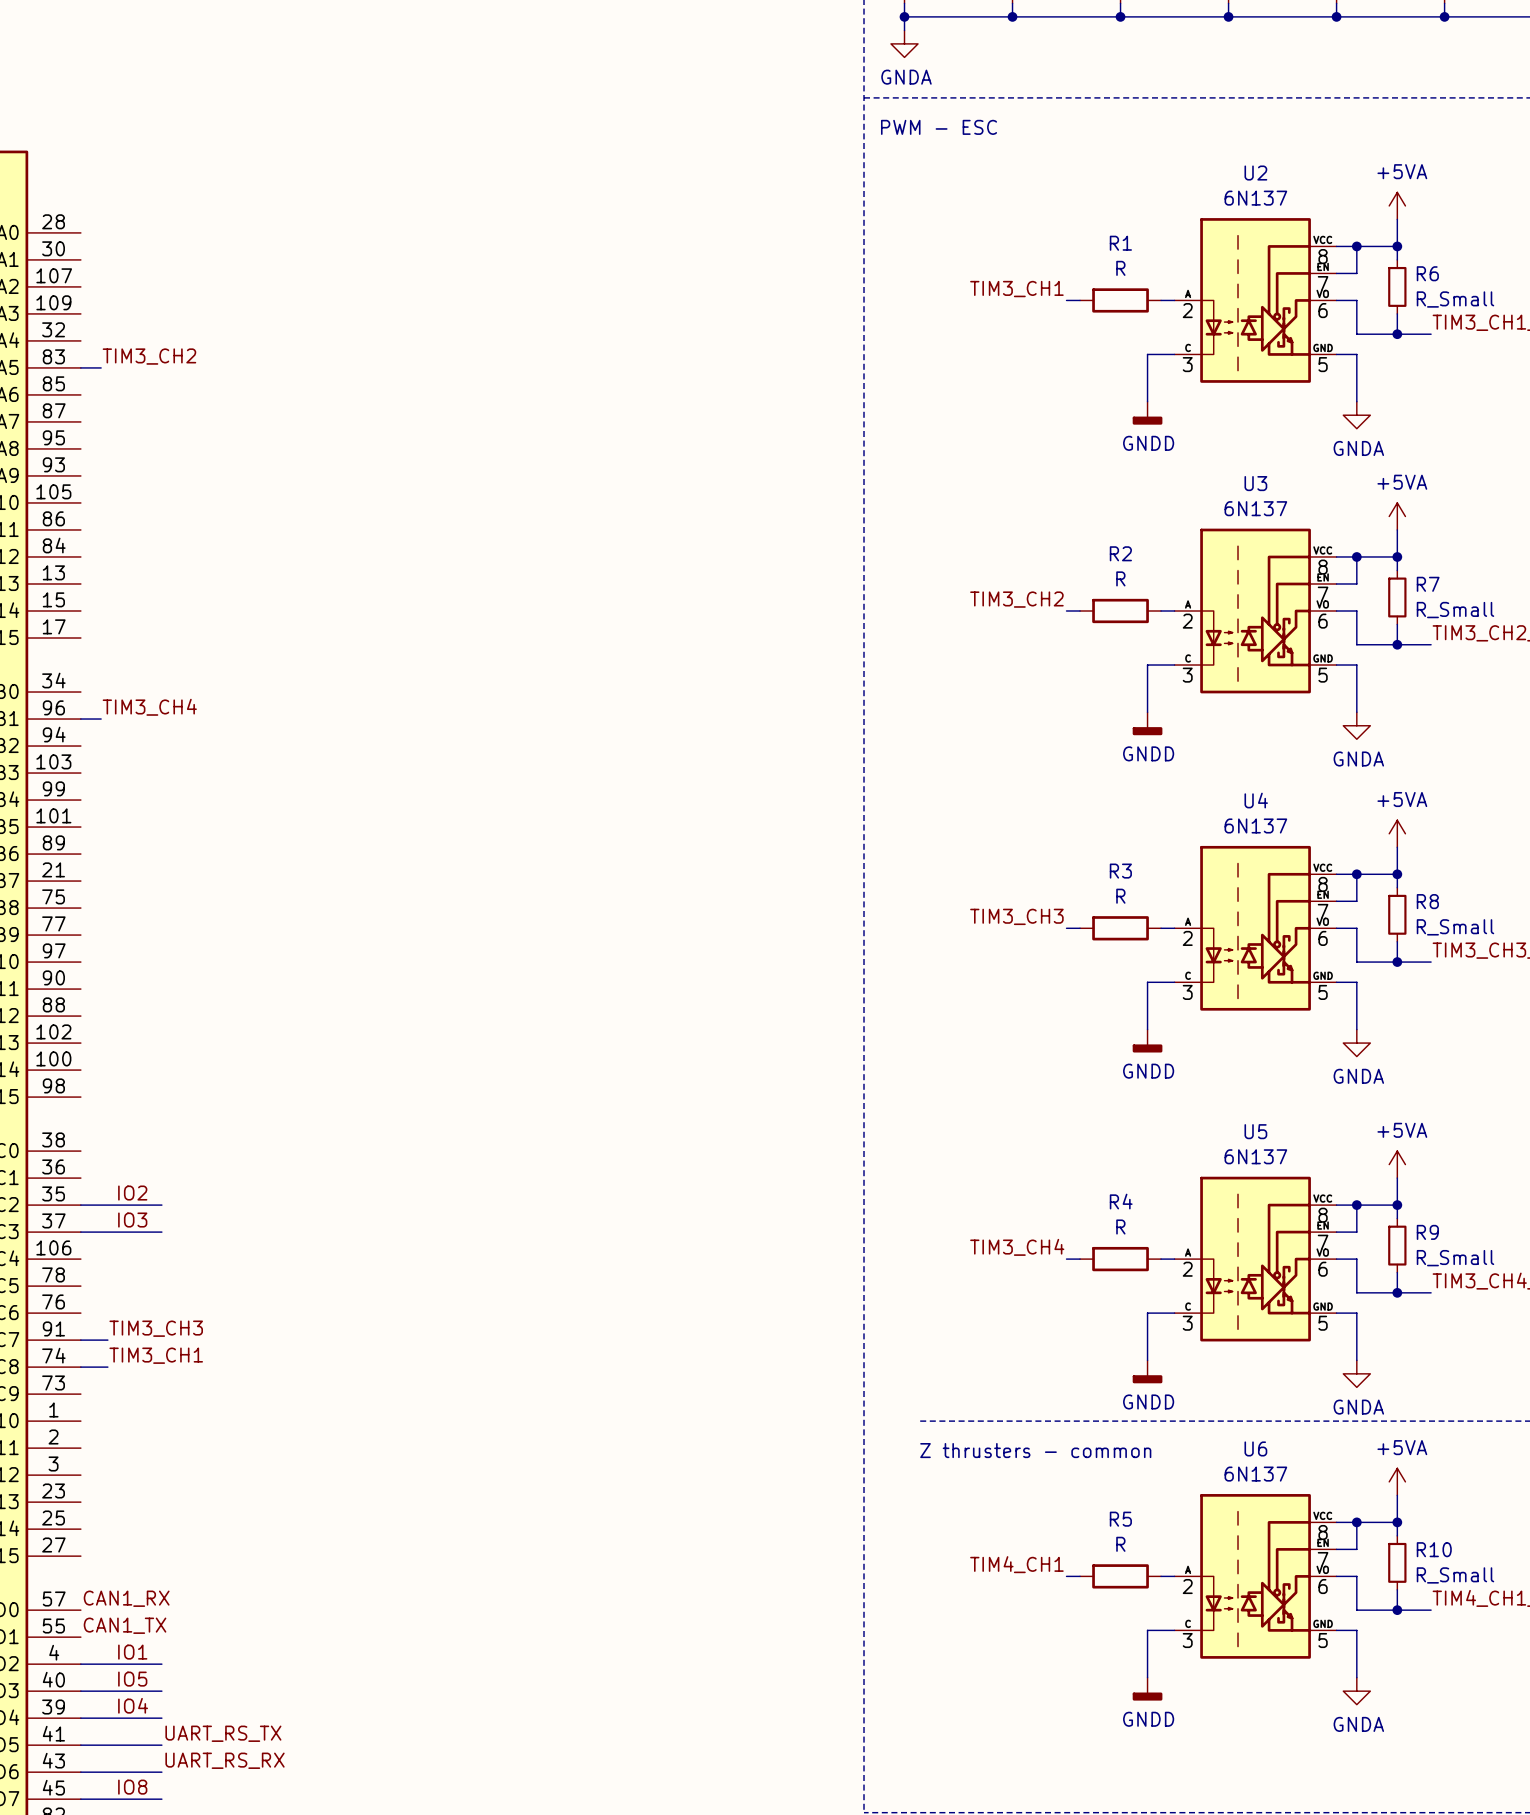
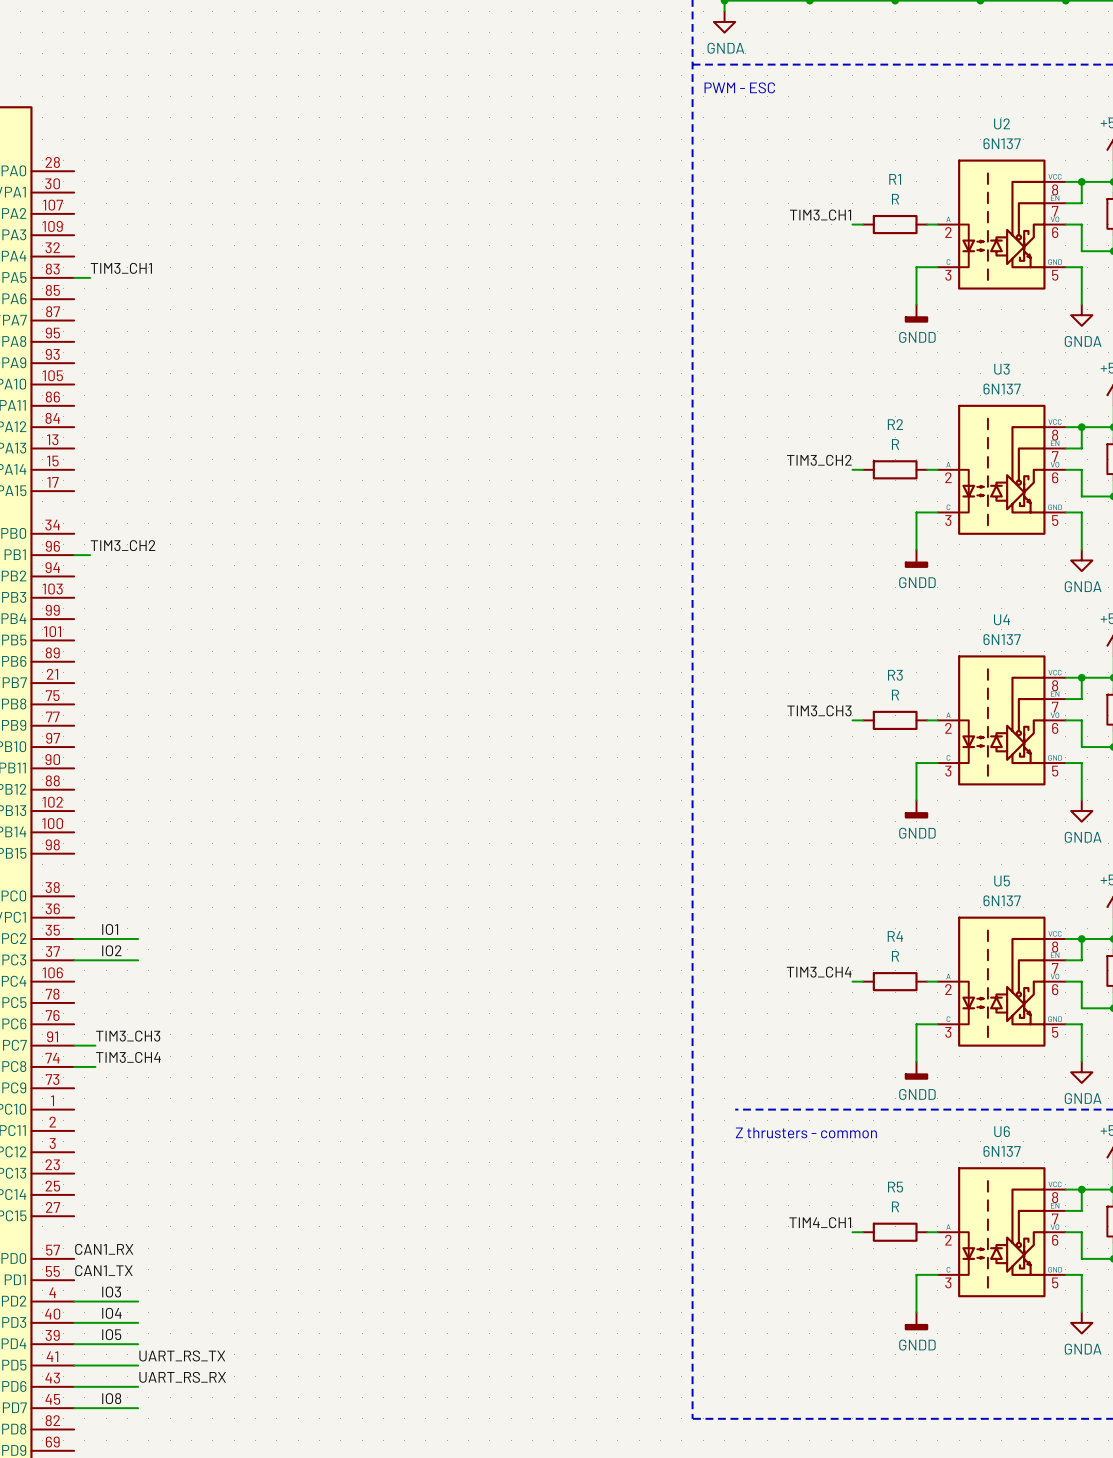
label: TIM3_CH2 (149, 356) -> TIM3_CH1 (121, 268)
label: TIM3_CH4 (149, 707) -> TIM3_CH2 (123, 545)
label: IO2 (132, 1193) -> IO1 (110, 929)
label: IO3 (132, 1220) -> IO2 (111, 950)
label: TIM3_CH1 (156, 1355) -> TIM3_CH4 (128, 1057)
label: IO1 (132, 1652) -> IO3 (111, 1292)
label: IO5 (132, 1679) -> IO4 (111, 1313)
label: IO4 (133, 1705) -> IO5 (111, 1334)

